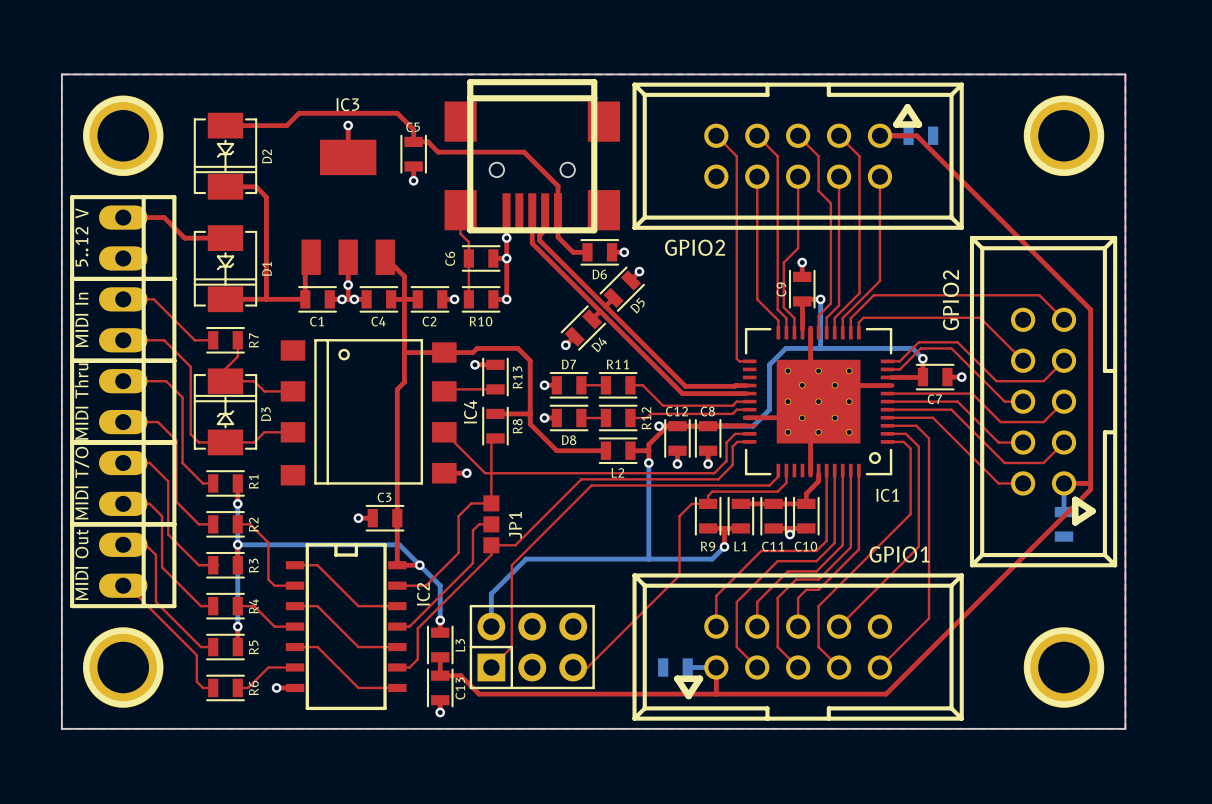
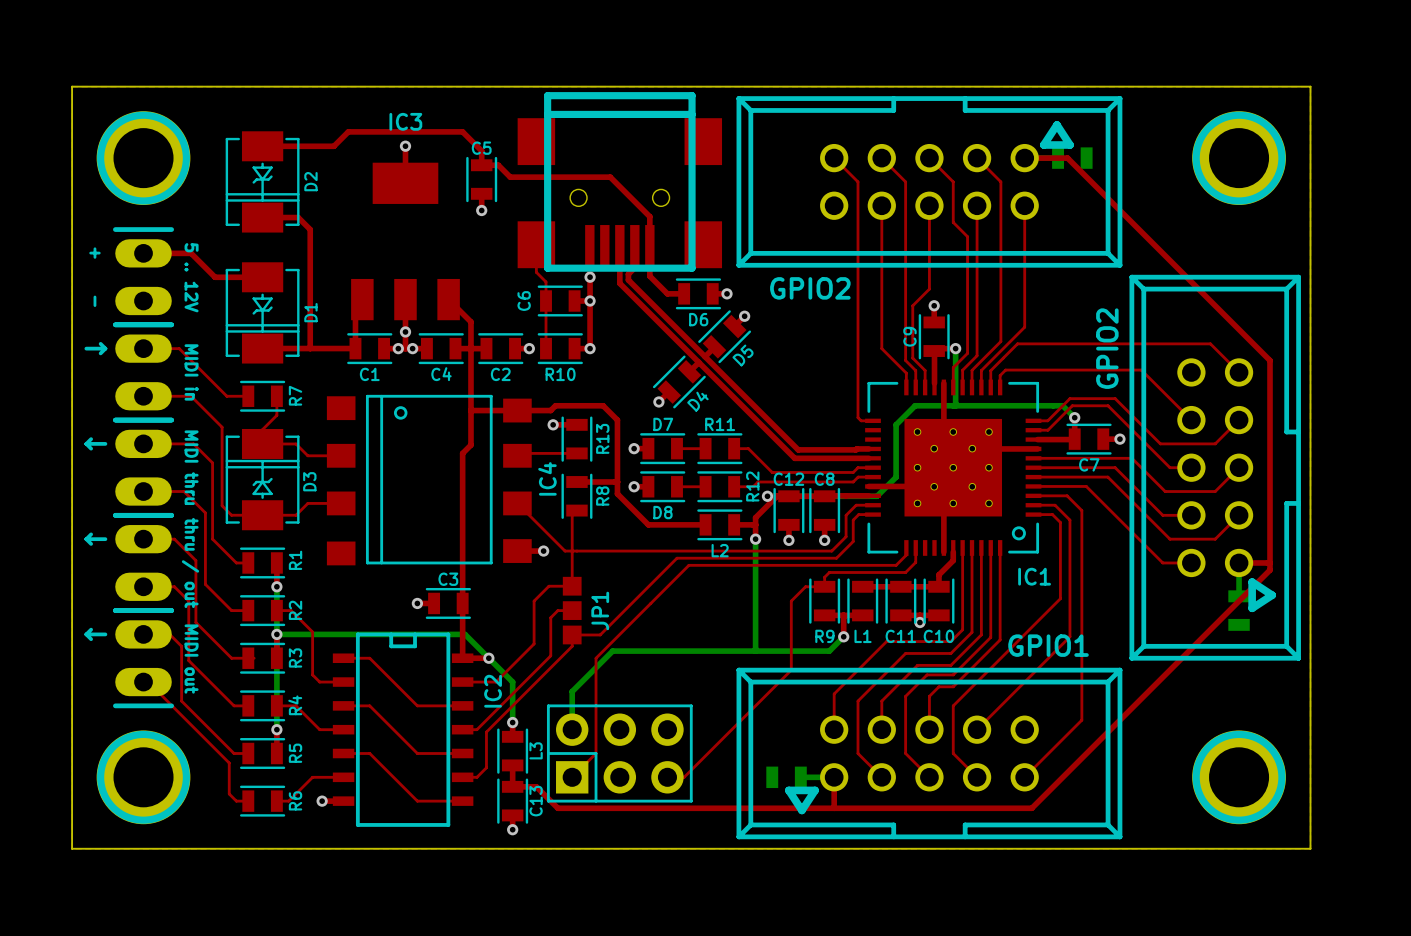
part footprint: [70, 195, 177, 281] -> [113, 227, 175, 328]
part value: 5..12 V (81, 237) -> none
text: none -> + - (94, 277)
text: none -> 5 .. 12V (191, 277)
part footprint: [70, 276, 177, 363] -> [113, 322, 175, 423]
line: none -> (100, 343) (105, 348)
line: none -> (86, 348) (105, 348)
line: none -> (105, 348) (100, 353)
part value: MIDI In (81, 319) -> none
text: none -> MIDI in (191, 372)
part footprint: [70, 358, 177, 445] -> [113, 417, 175, 518]
line: none -> (91, 439) (86, 443)
line: none -> (86, 443) (91, 448)
line: none -> (86, 443) (105, 443)
part value: MIDI Thru (81, 401) -> none
text: none -> MIDI thru (191, 467)
part footprint: [70, 440, 177, 527] -> [113, 512, 175, 613]
line: none -> (91, 534) (86, 539)
line: none -> (86, 539) (91, 543)
line: none -> (86, 539) (105, 539)
part value: MIDI T/O (81, 483) -> none
text: none -> thru / out (190, 562)
part footprint: [70, 522, 177, 609] -> [113, 608, 175, 709]
line: none -> (91, 629) (86, 634)
line: none -> (86, 634) (91, 639)
line: none -> (86, 634) (105, 634)
part value: MIDI Out (81, 564) -> none
text: none -> MIDI out (191, 659)

